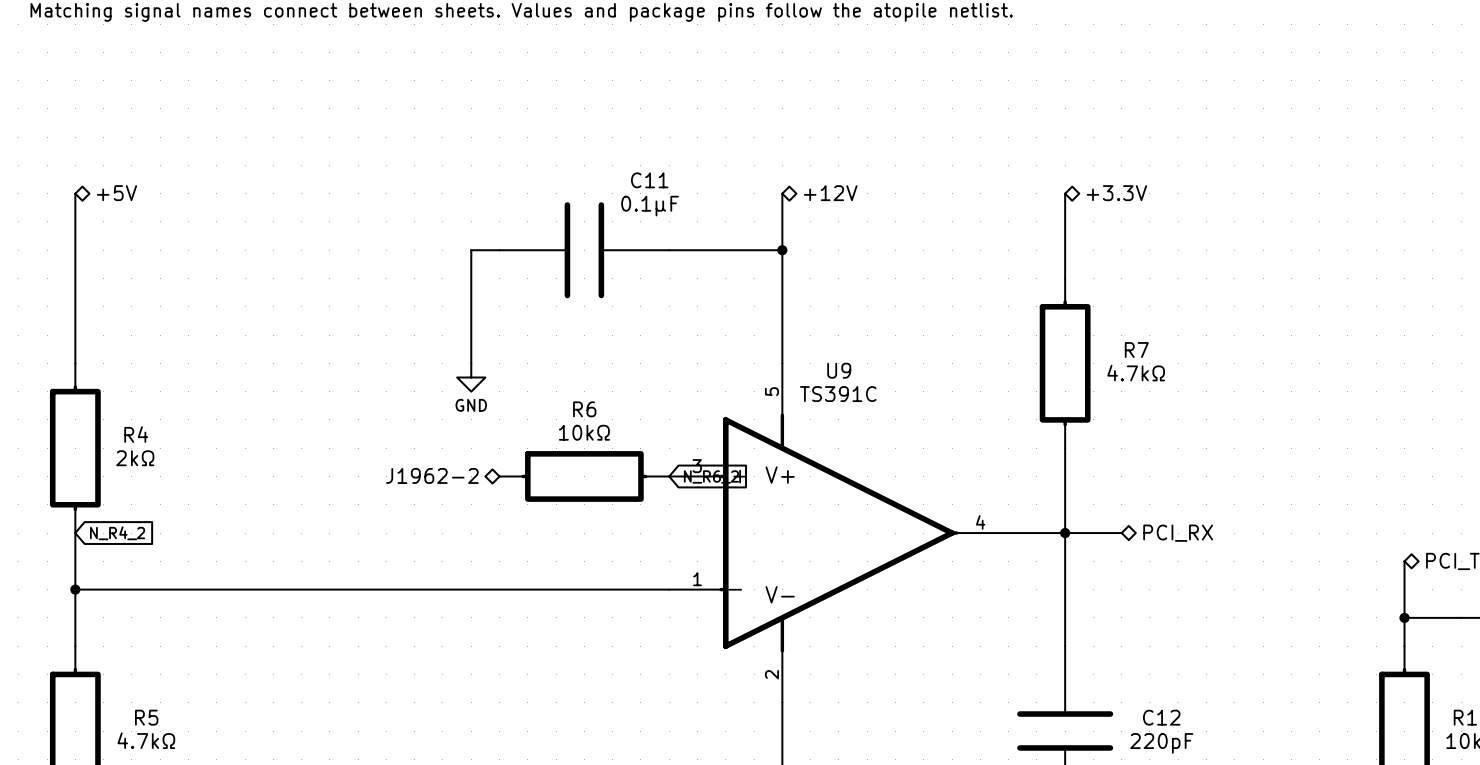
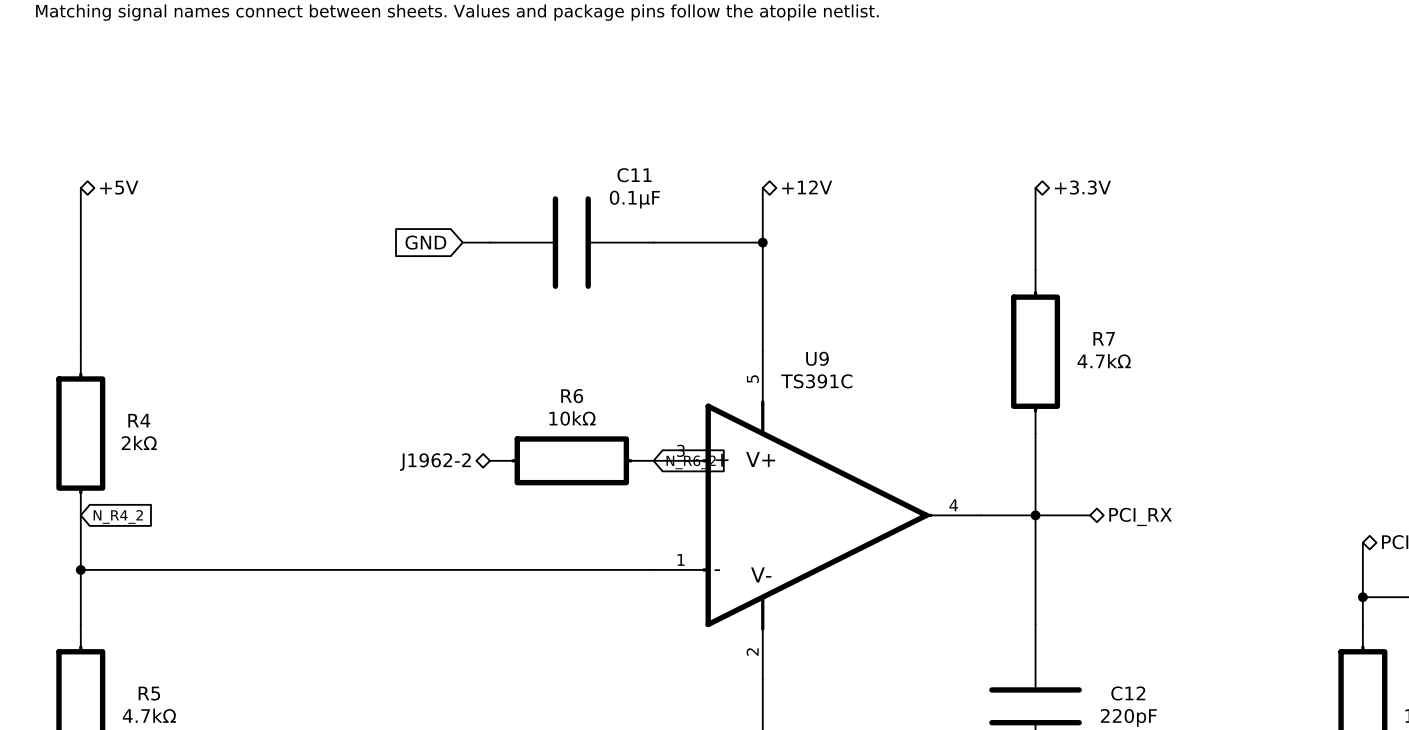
global label: none -> GND (425, 242)
wire: (471, 250) (471, 363) -> none
power symbol: GND (471, 377) -> none

